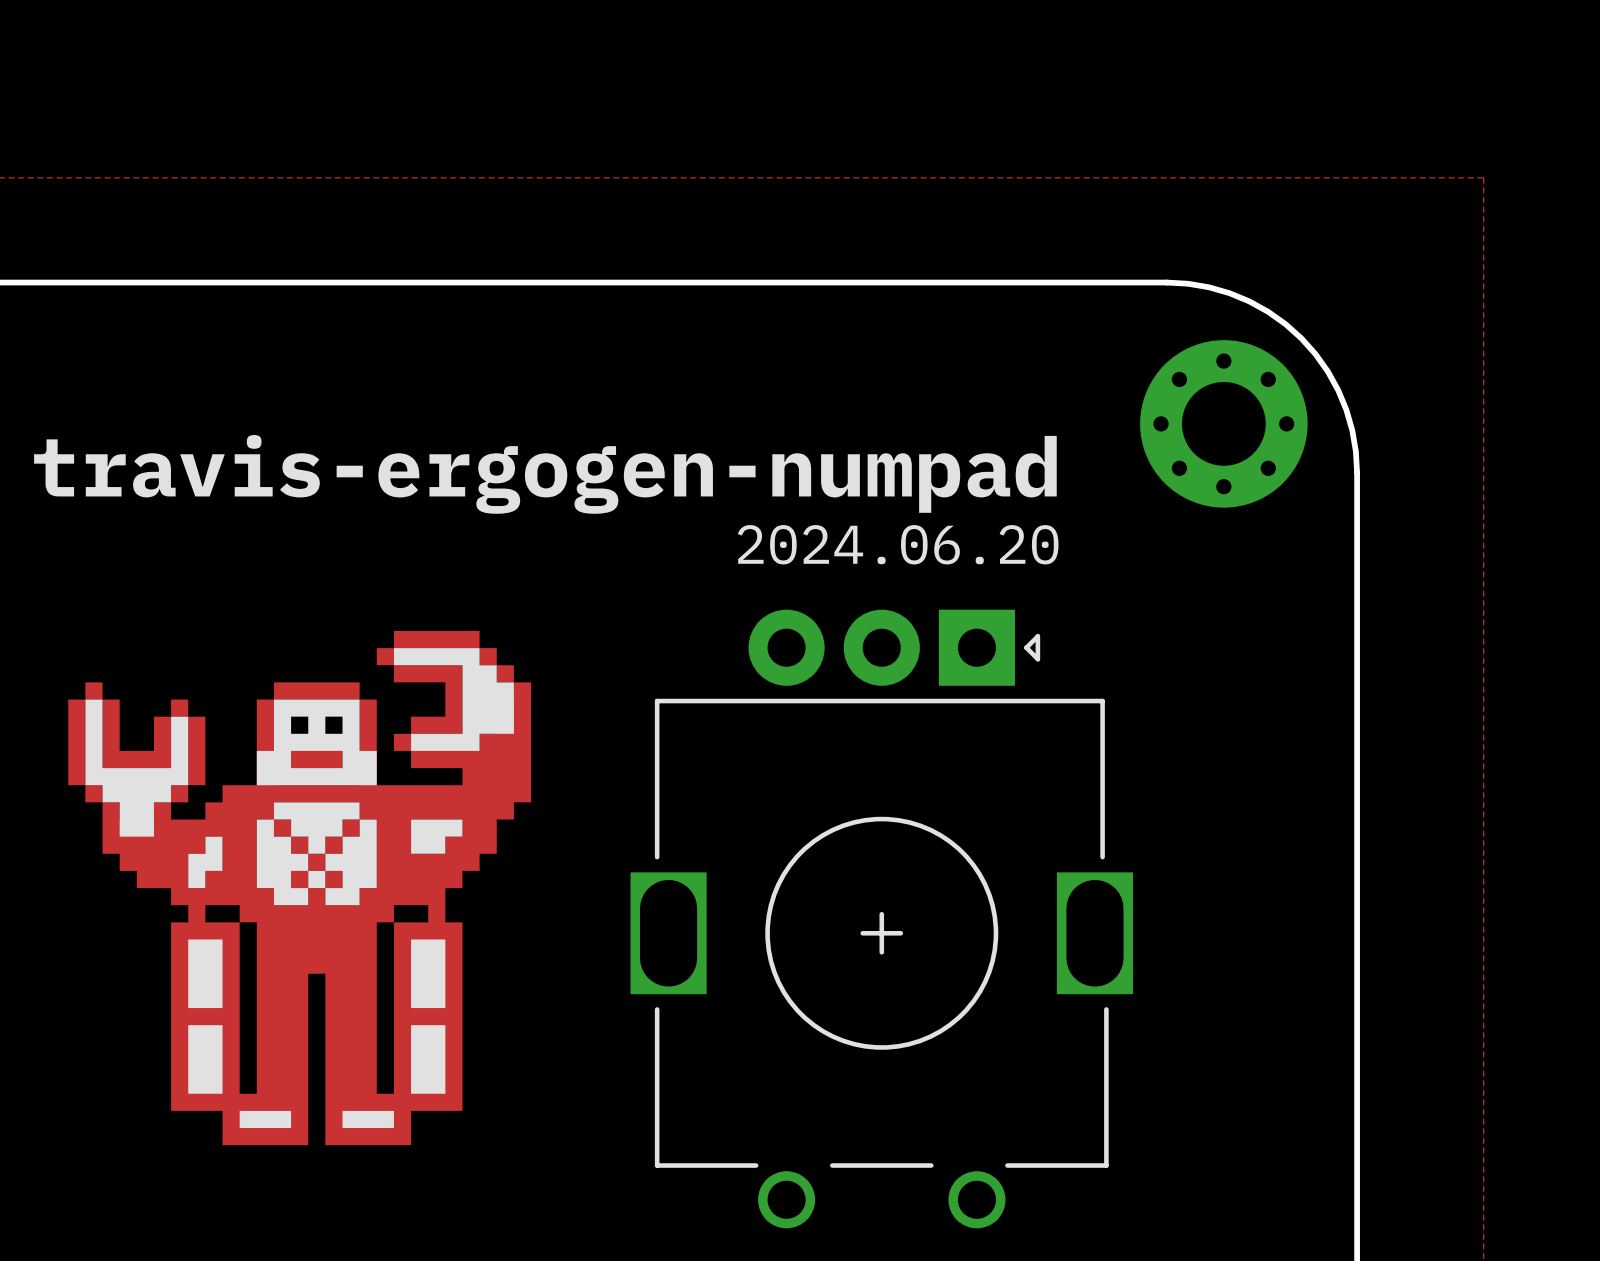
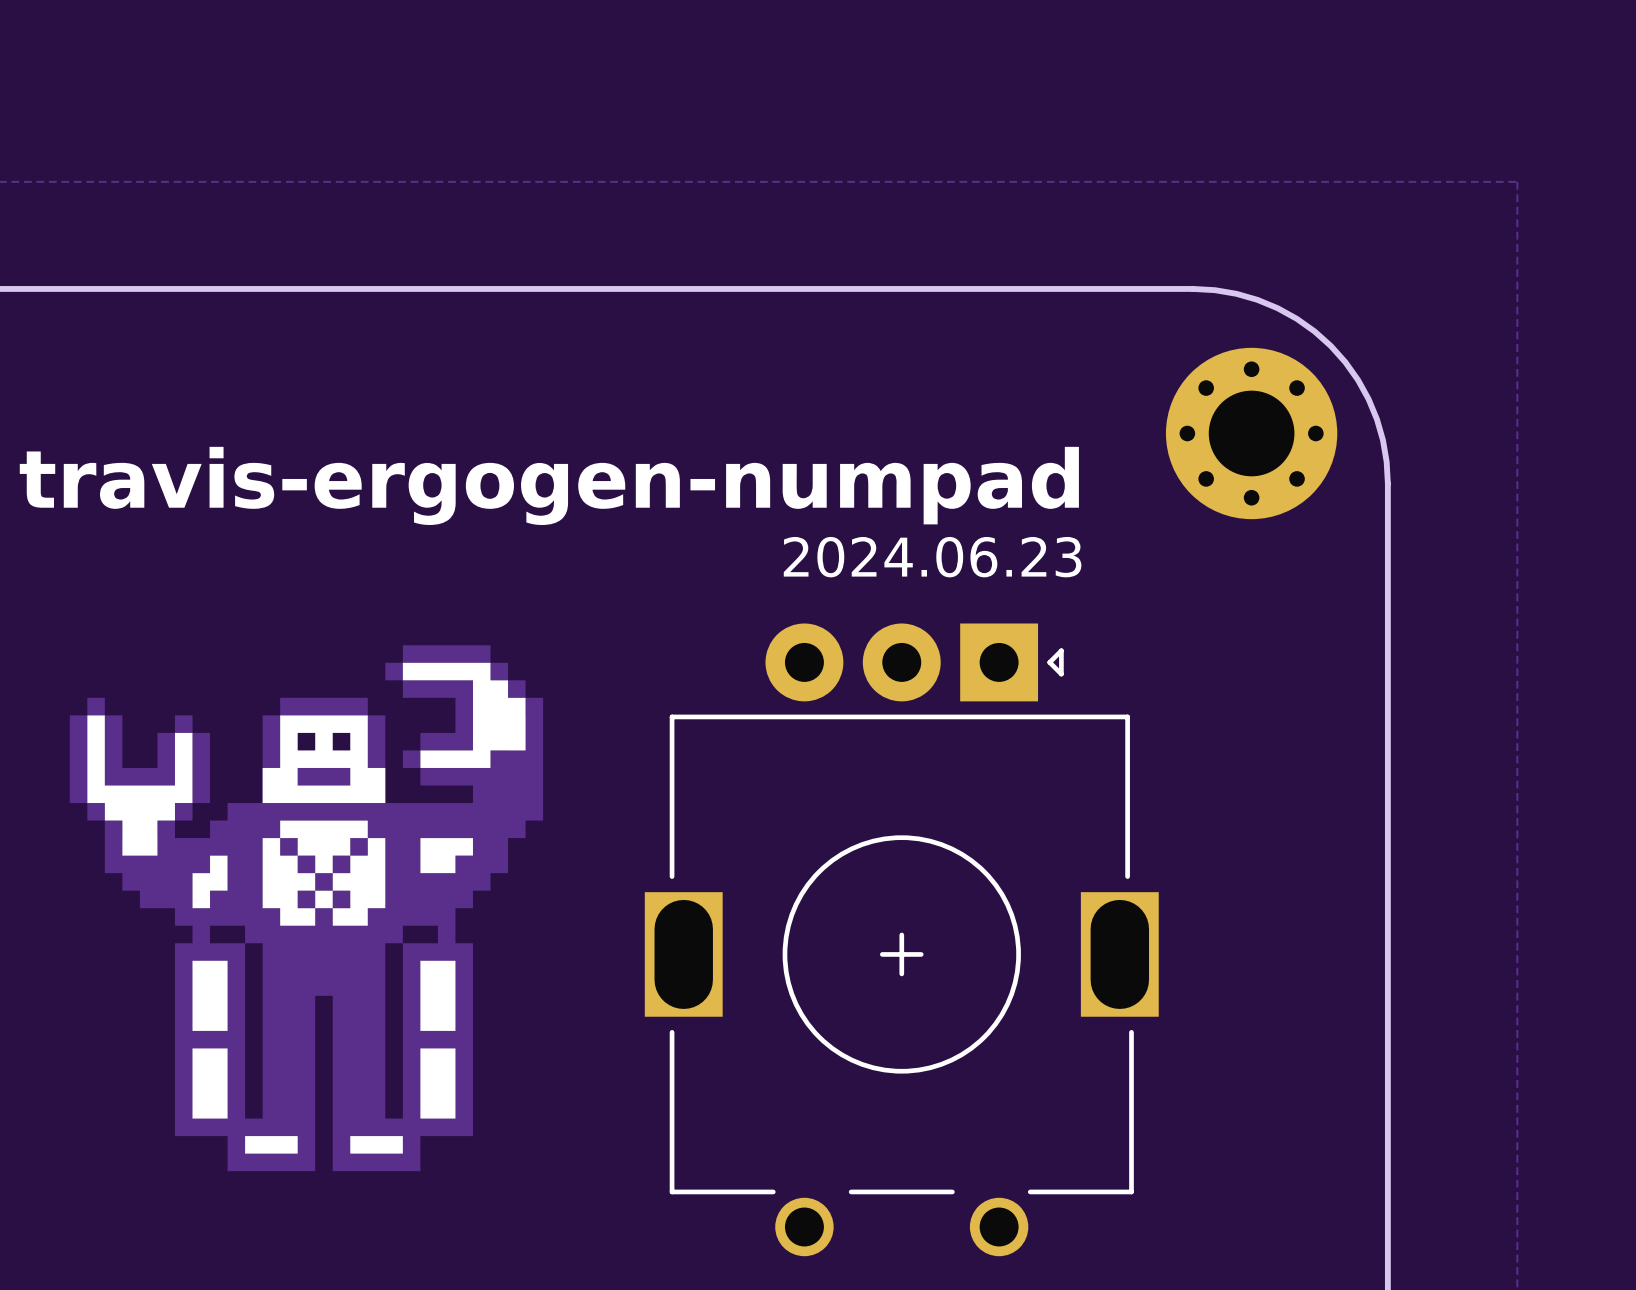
text: 2024.06.20 (898, 544) -> 2024.06.23 (932, 557)

